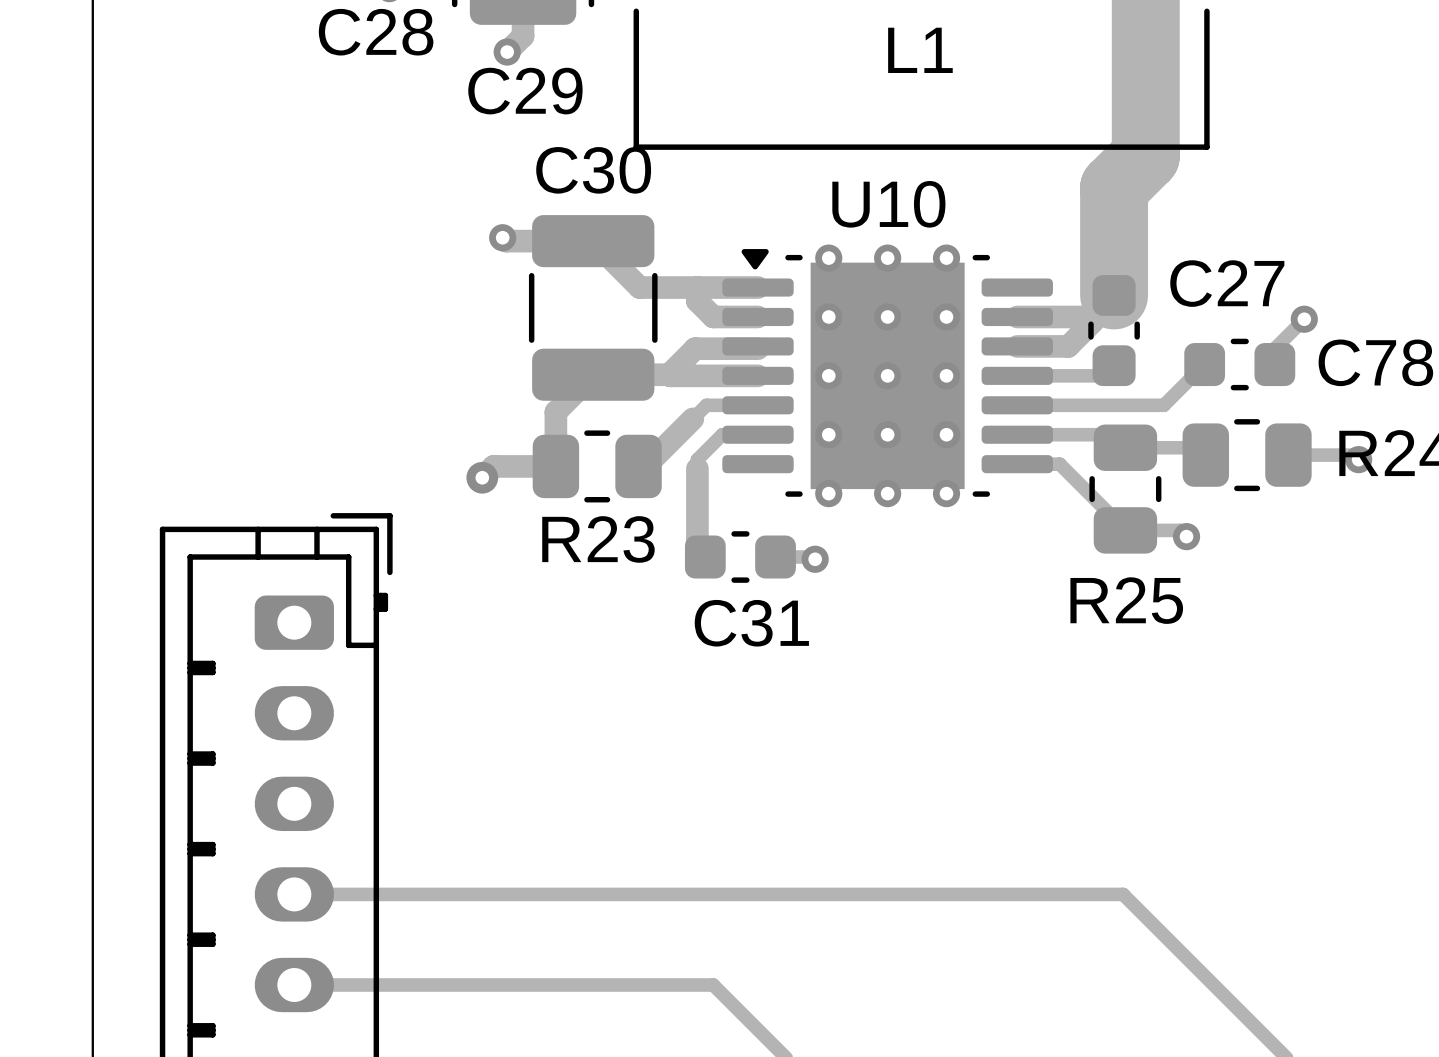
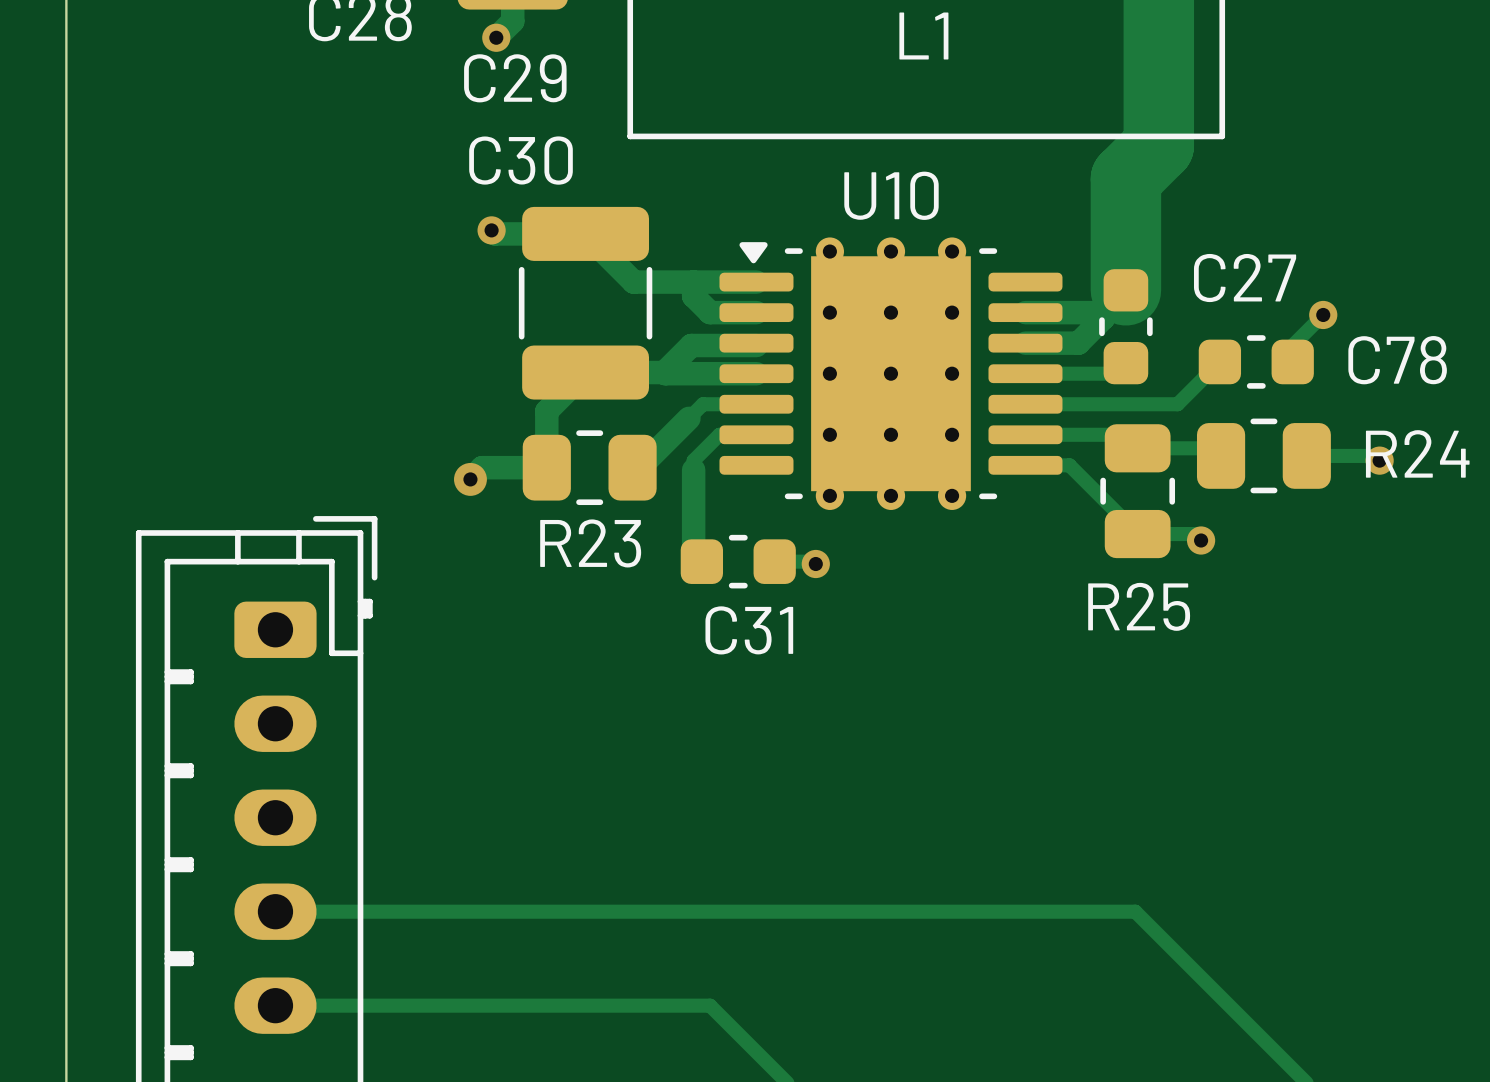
C30 name position: C30 (593, 170) -> C30 (521, 160)

